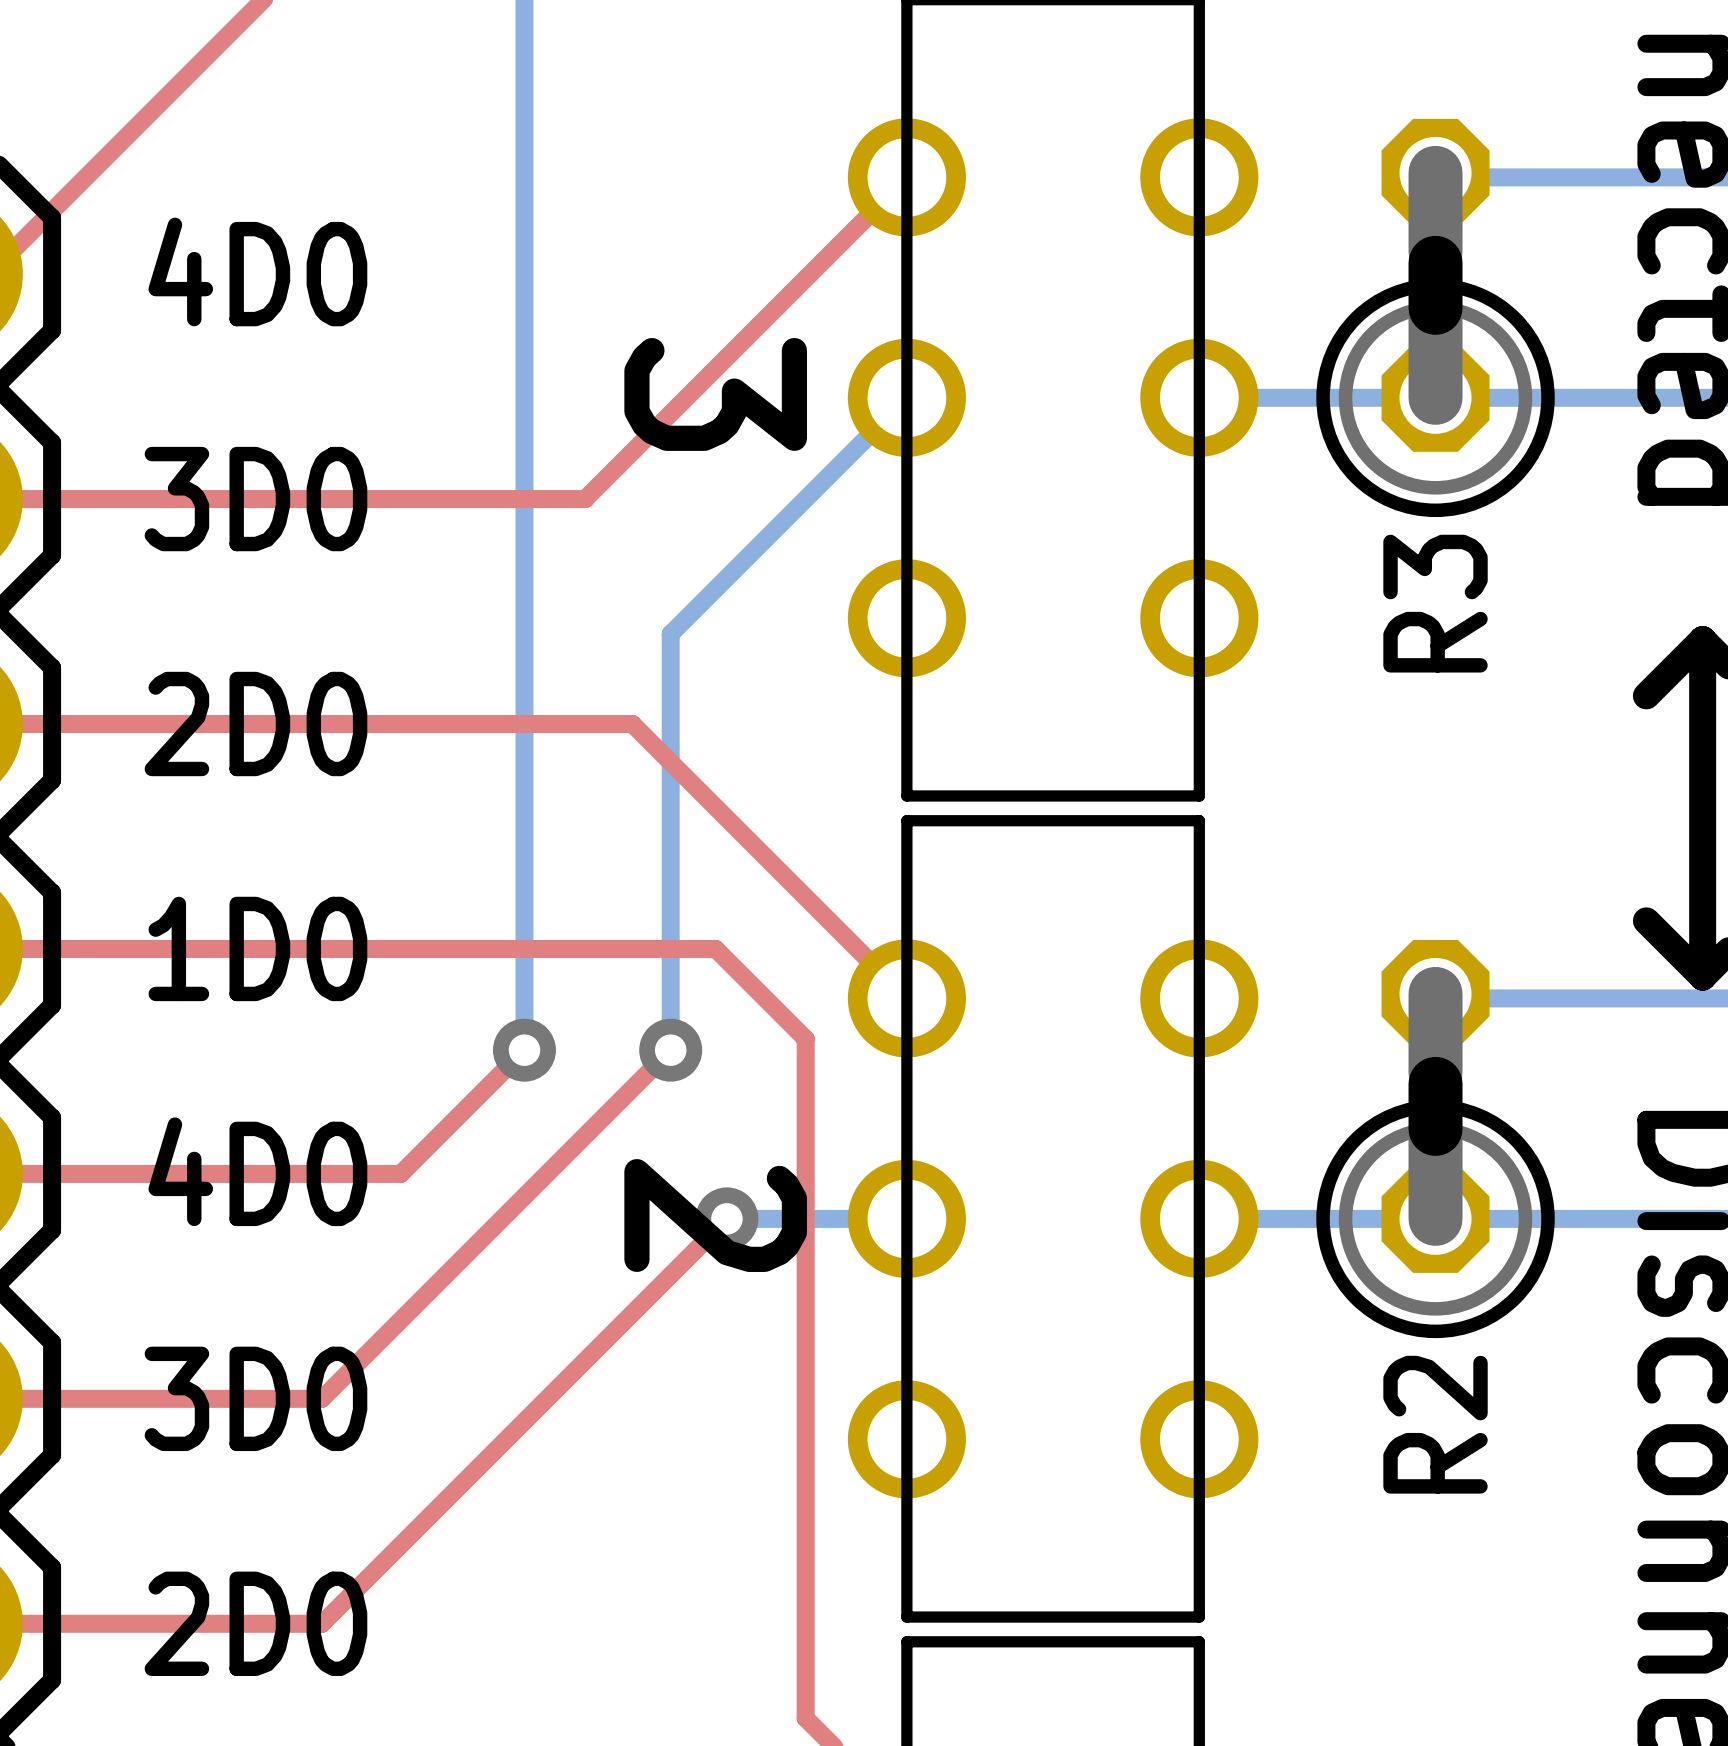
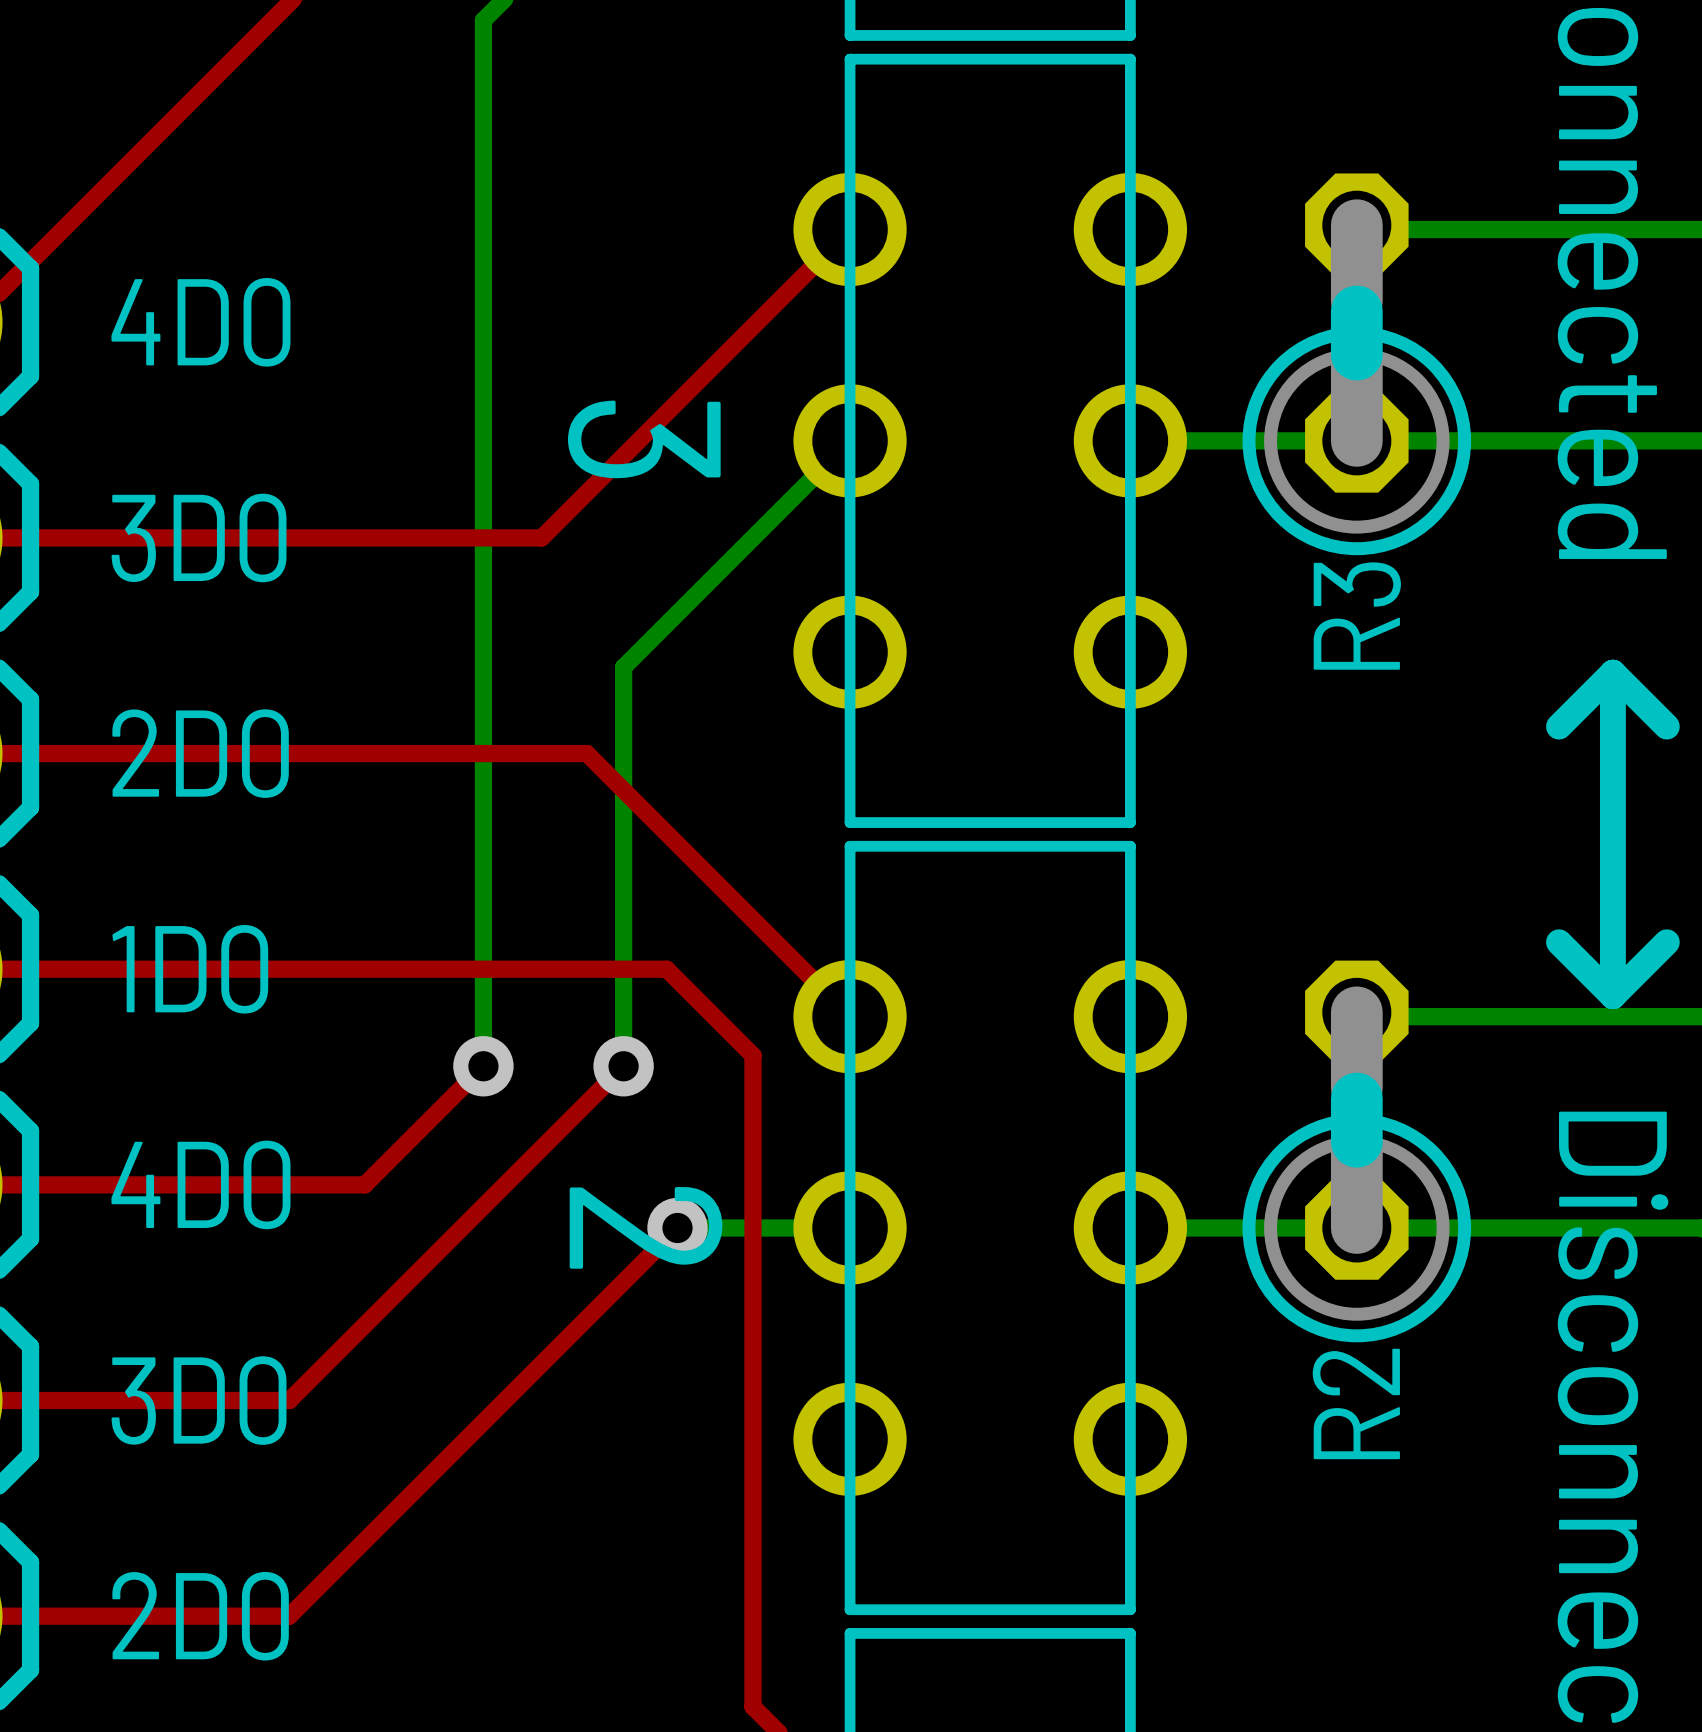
text position: 3 (715, 394) -> 3 (644, 439)
text position: 2 (715, 1215) -> 2 (646, 1227)

